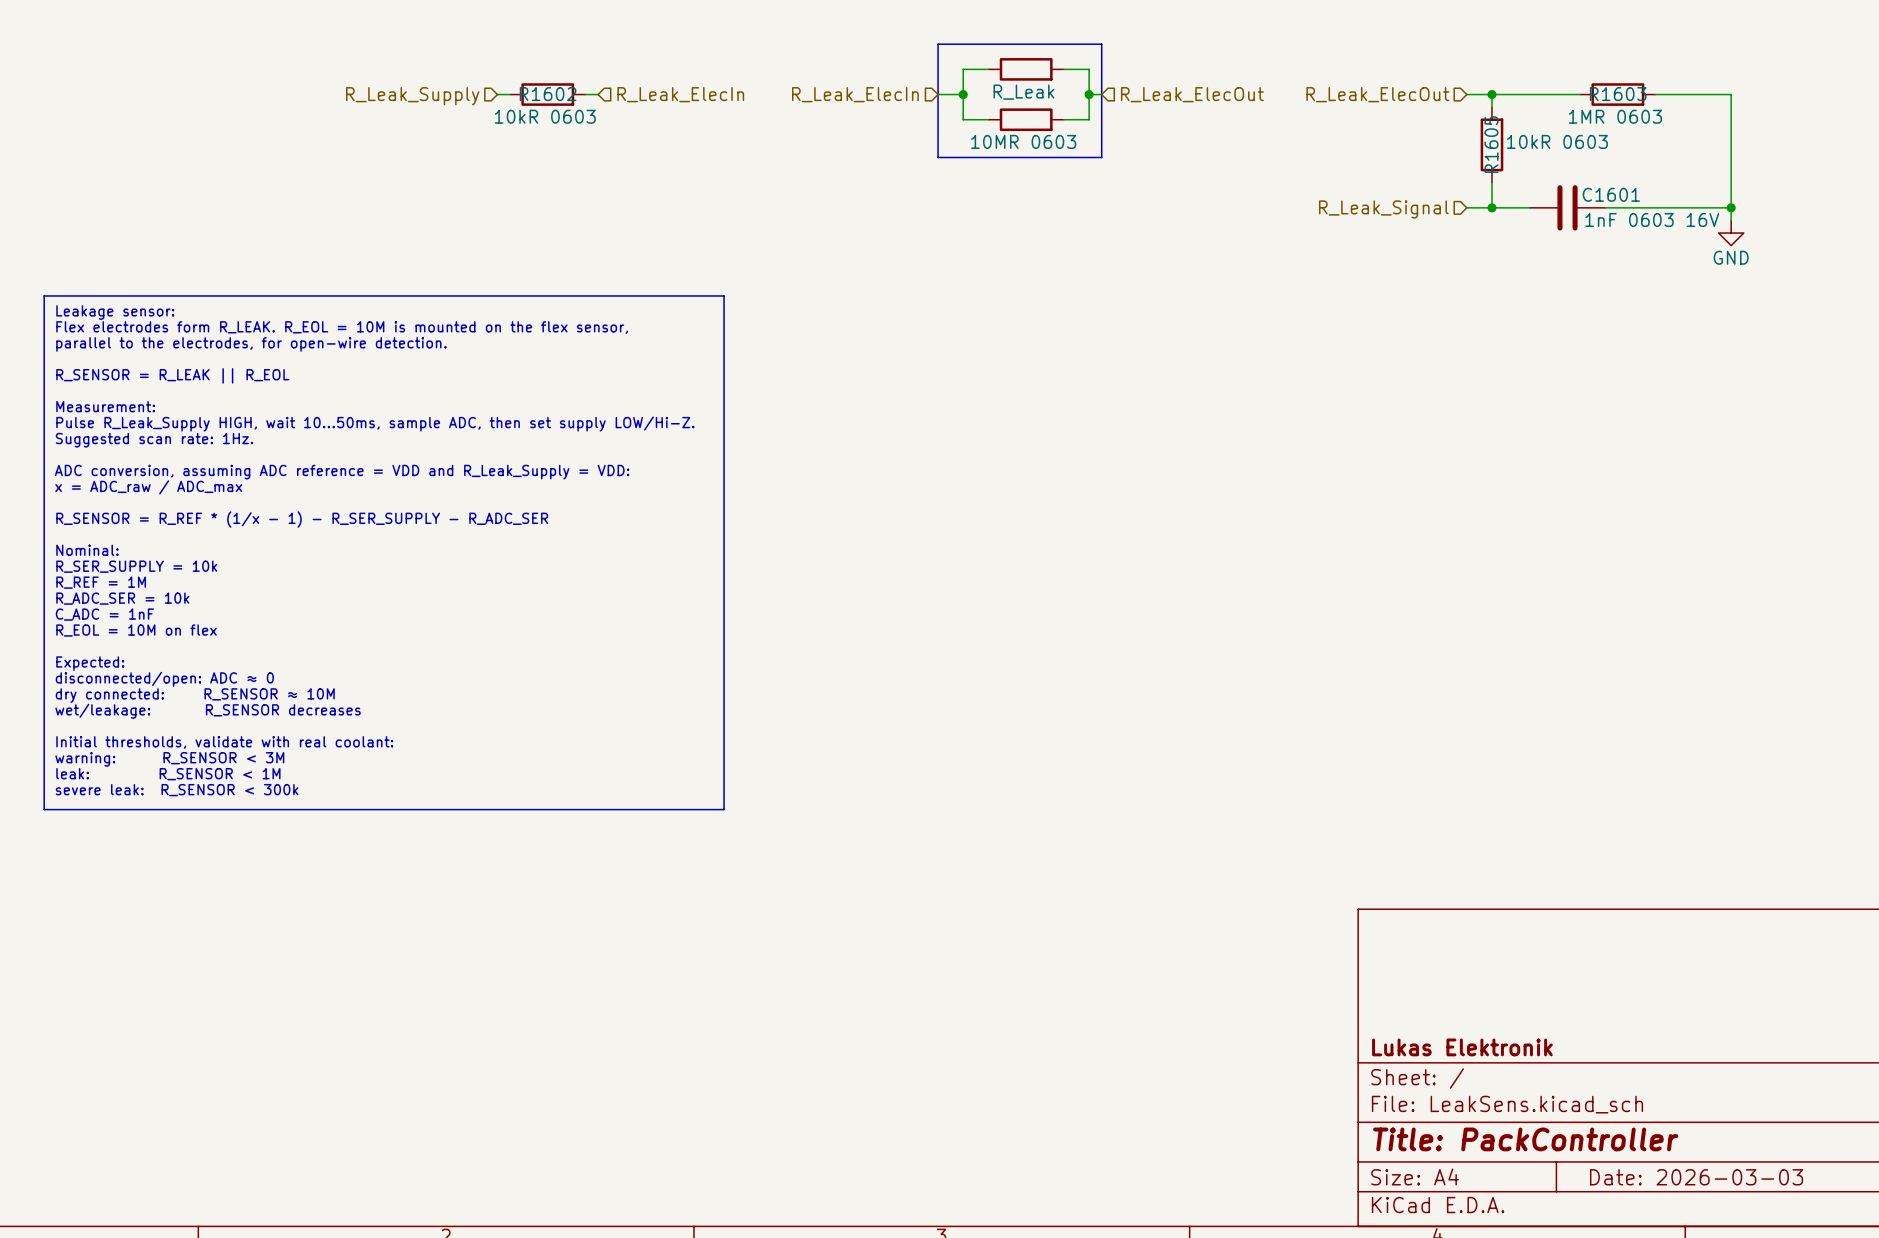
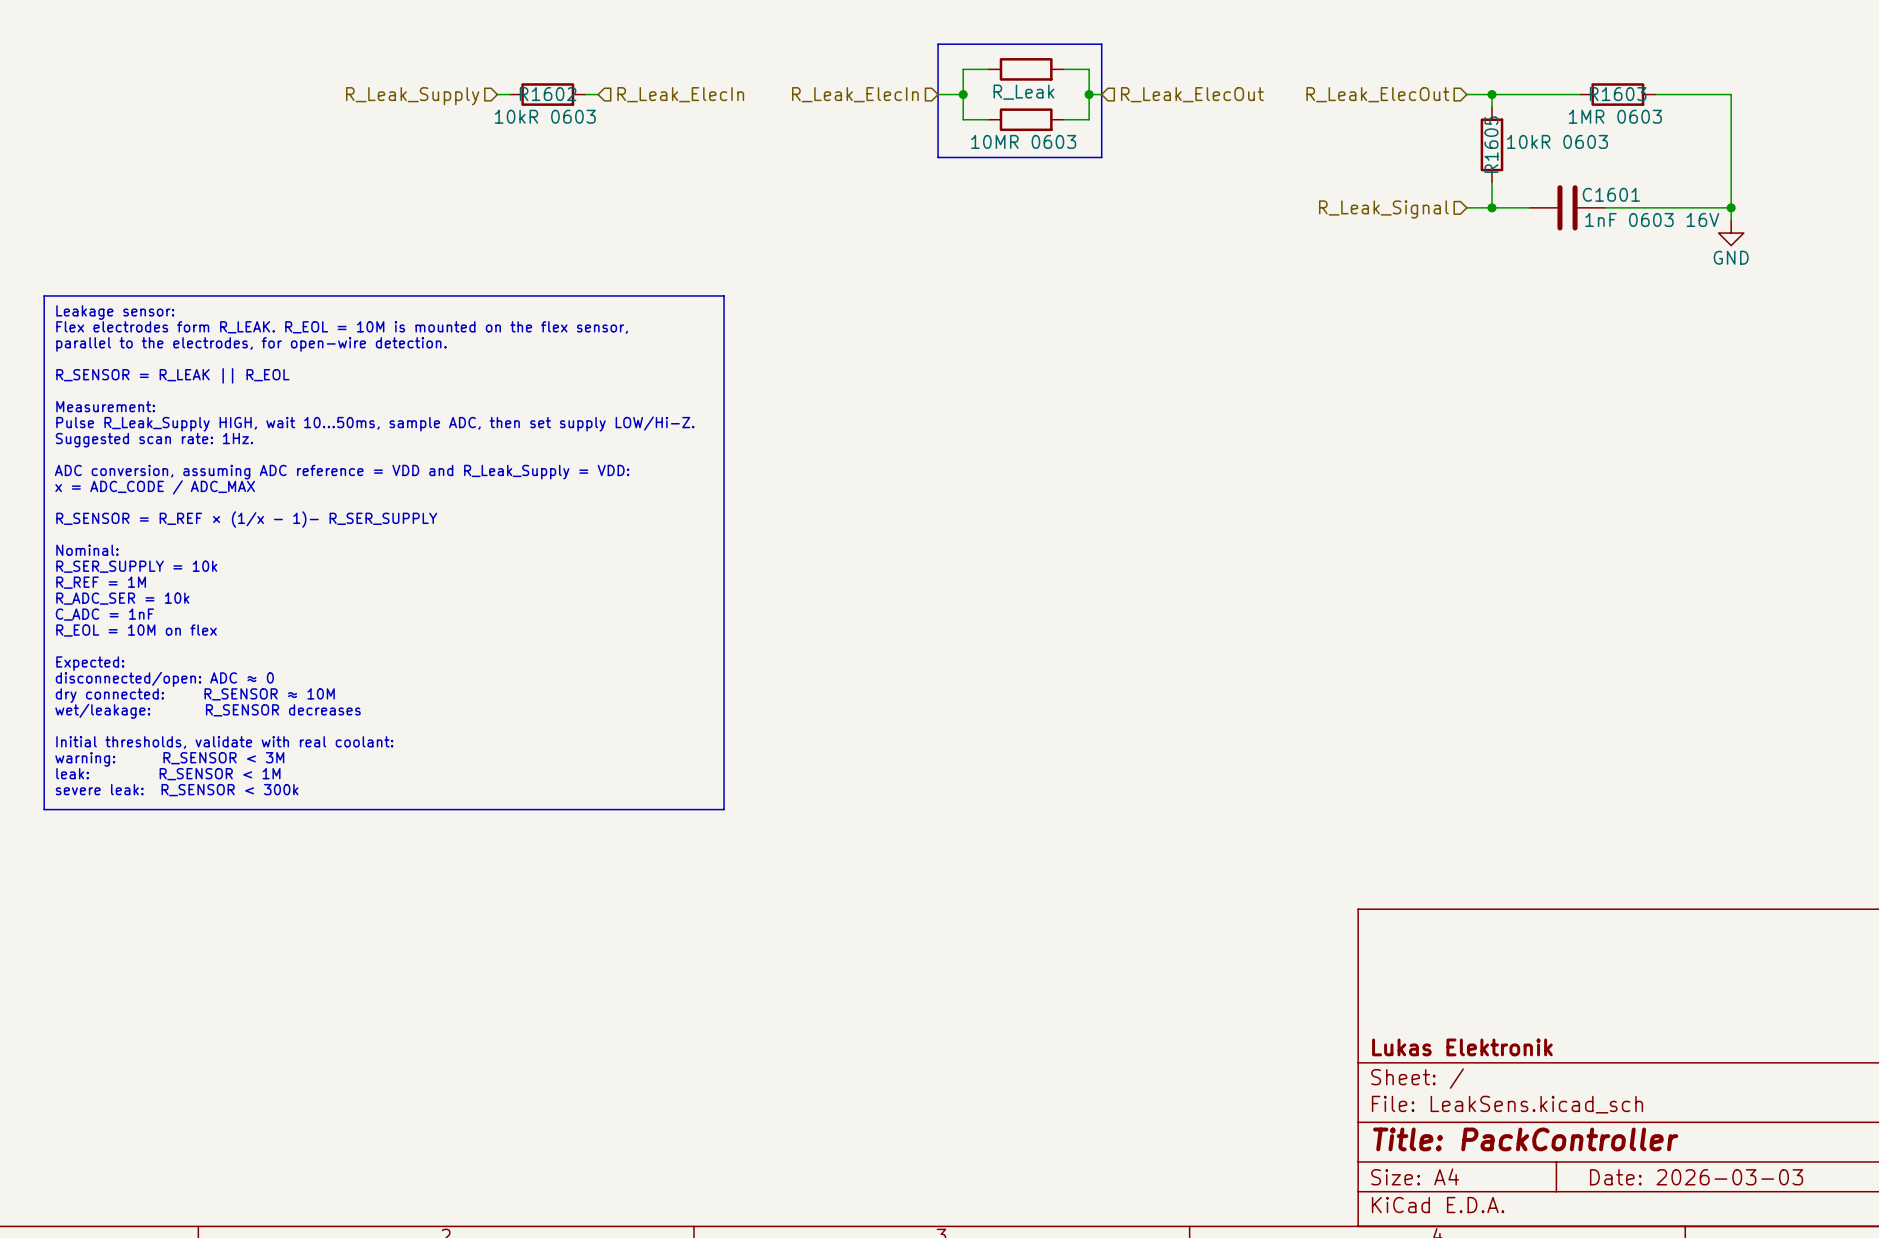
text: x = ADC_raw / ADC_max (148, 487) -> x = ADC_CODE / ADC_MAX (155, 487)
text: R_SENSOR = R_REF * (1/x - 1) - R_SER_SUPPLY - R_ADC_SER (302, 519) -> R_SENSOR = R_REF × (1/x - 1)- R_SER_SUPPLY (246, 519)

